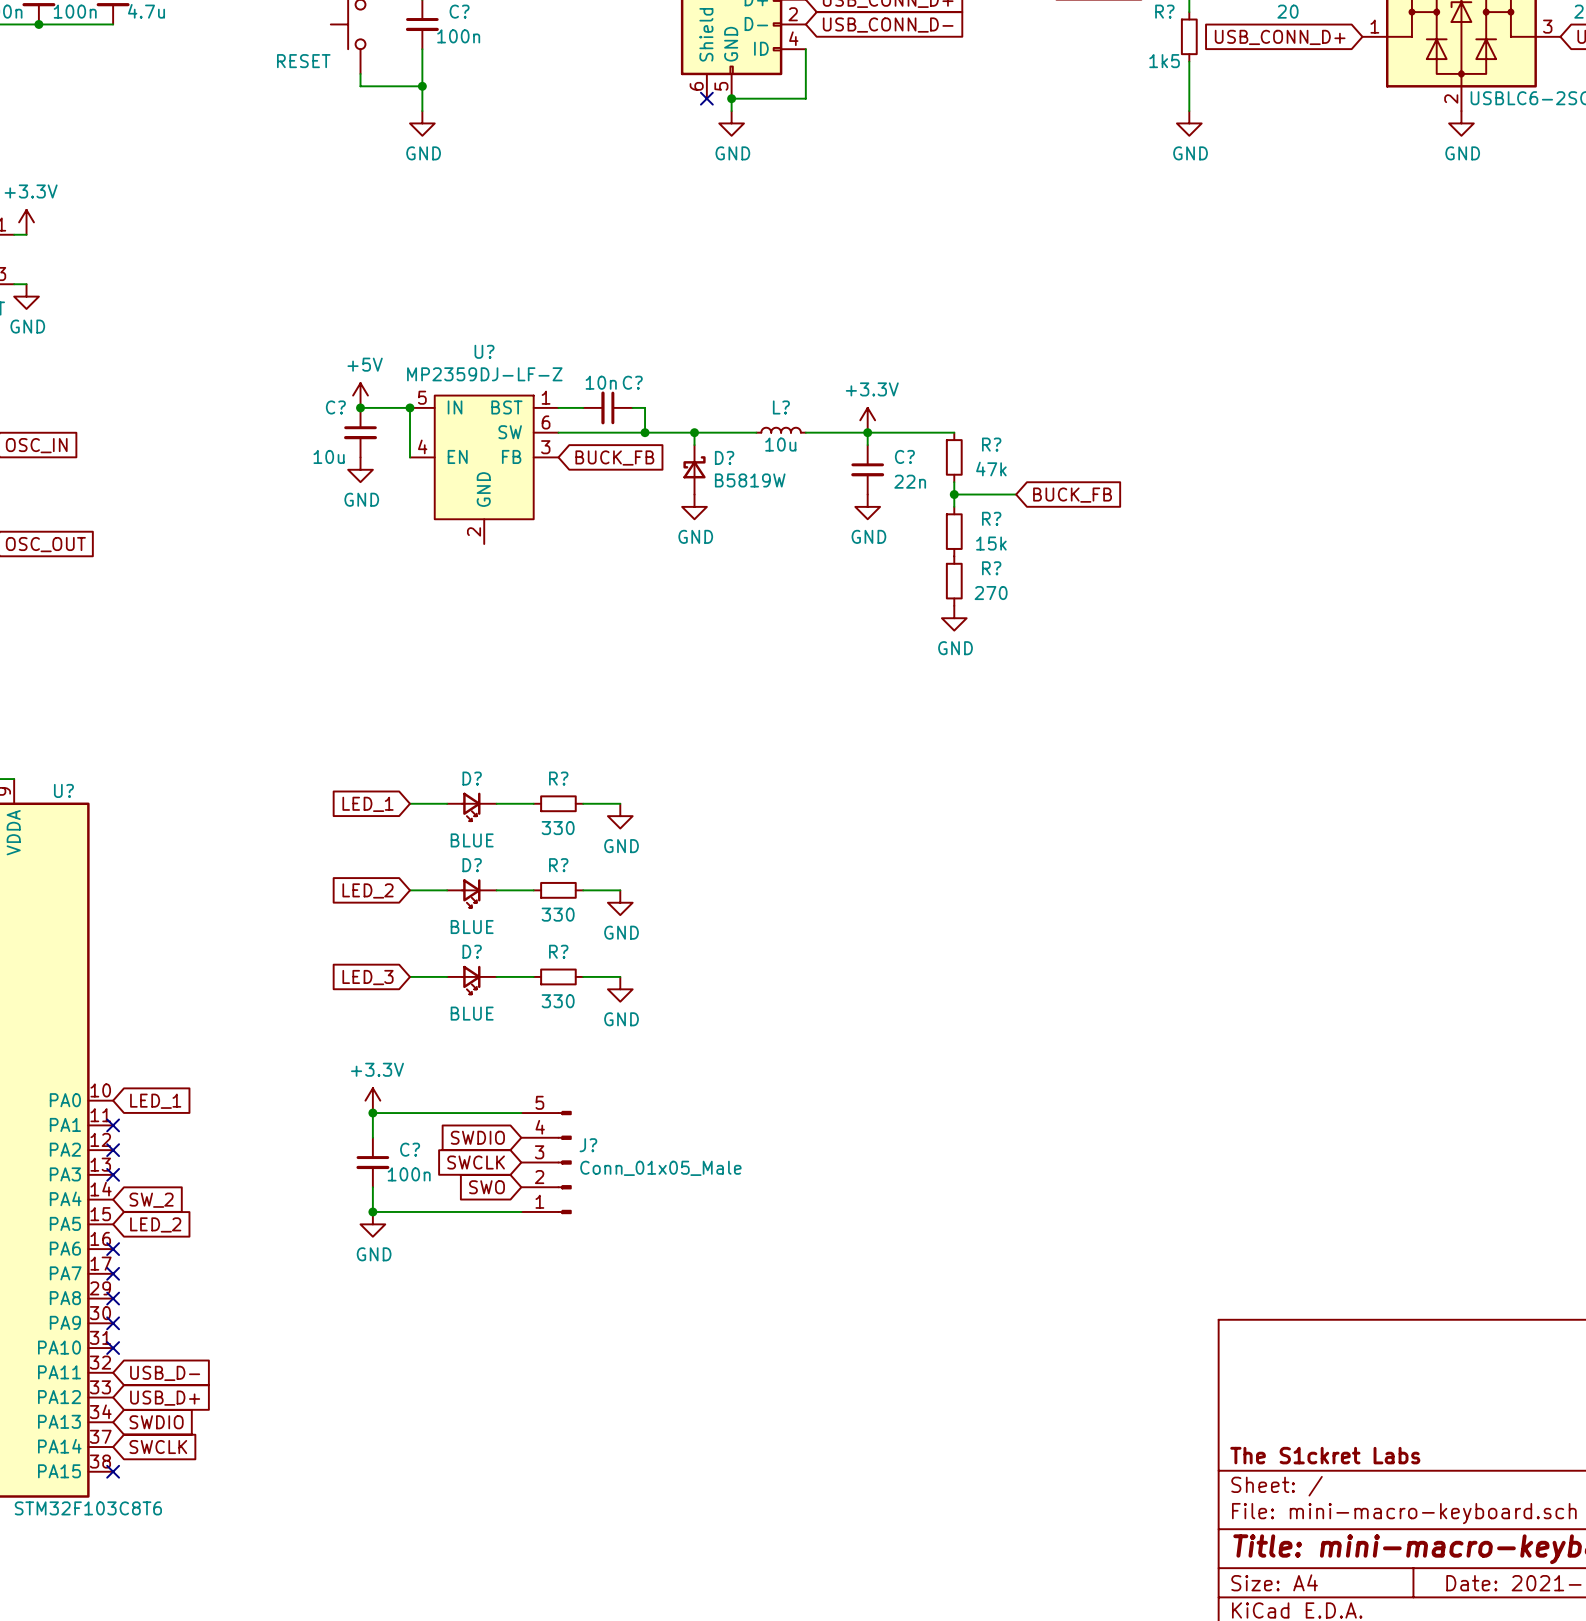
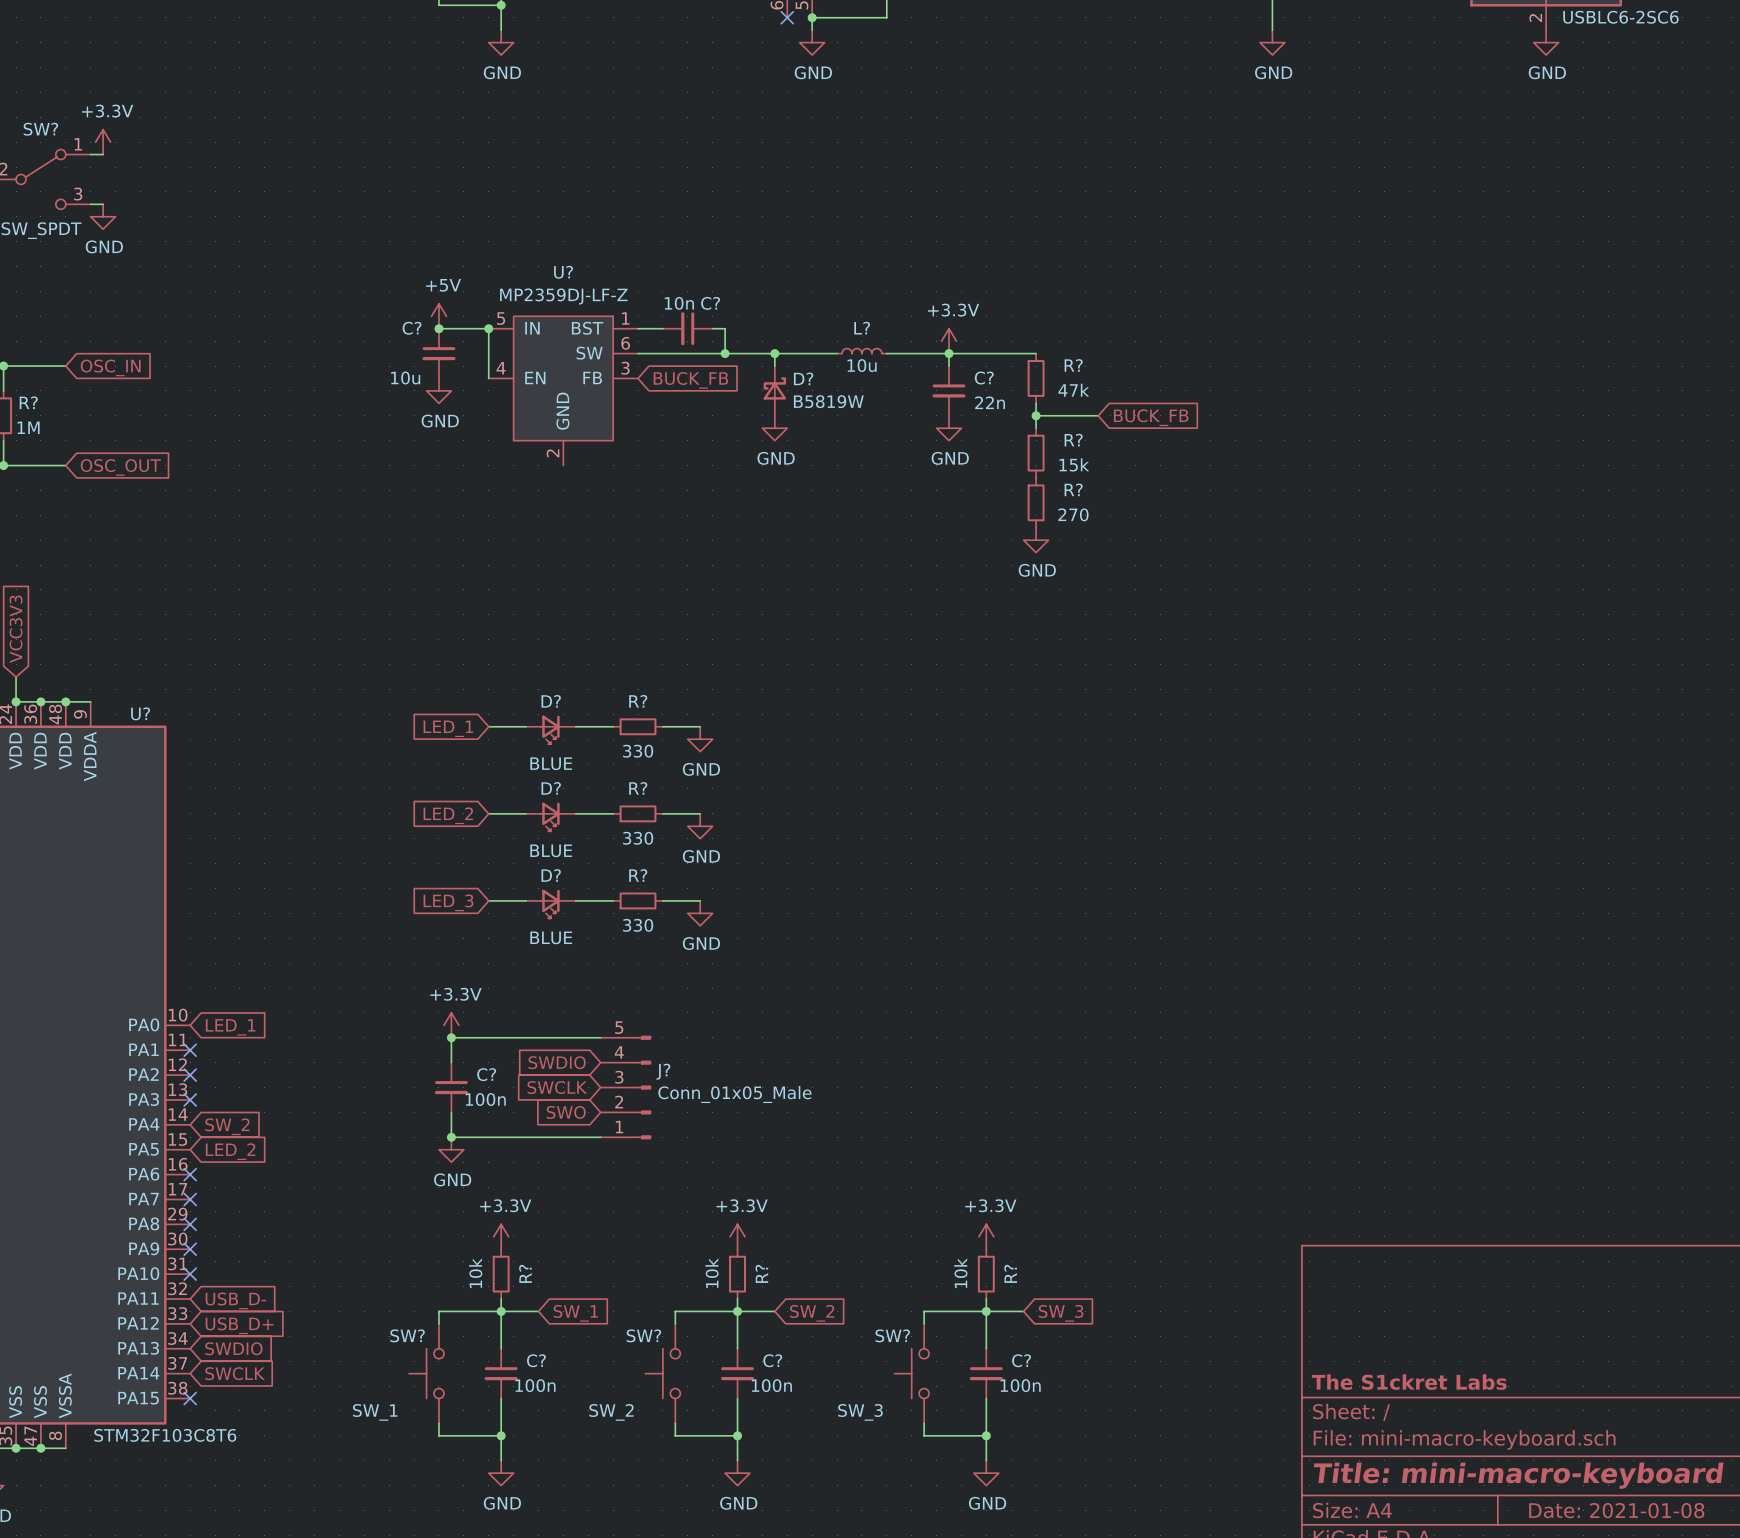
power symbol: none -> +3.3V (501, 1236)
power symbol: none -> +3.3V (737, 1236)
power symbol: none -> +3.3V (986, 1236)
R?: none -> 10k (501, 1274)
R?: none -> 10k (737, 1274)
R?: none -> 10k (986, 1274)
wire: none -> (501, 1299) (501, 1348)
wire: none -> (737, 1299) (737, 1348)
wire: none -> (986, 1299) (986, 1348)
junction: none -> (501, 1311)
wire: none -> (538, 1311) (438, 1311) (438, 1323)
global label: none -> SW_1 (575, 1313)
junction: none -> (737, 1311)
wire: none -> (774, 1311) (675, 1311) (675, 1323)
global label: none -> SW_2 (812, 1313)
junction: none -> (986, 1311)
wire: none -> (1023, 1311) (924, 1311) (924, 1323)
global label: none -> SW_3 (1061, 1313)
SW?: none -> SW_1 (426, 1373)
C?: none -> 100n (501, 1373)
SW?: none -> SW_2 (662, 1373)
C?: none -> 100n (737, 1373)
SW?: none -> SW_3 (911, 1373)
C?: none -> 100n (986, 1373)
wire: none -> (501, 1398) (501, 1460)
wire: none -> (737, 1398) (737, 1460)
wire: none -> (986, 1398) (986, 1460)
wire: none -> (438, 1423) (438, 1435) (501, 1435)
wire: none -> (675, 1423) (675, 1435) (737, 1435)
wire: none -> (924, 1423) (924, 1435) (986, 1435)
junction: none -> (501, 1435)
junction: none -> (737, 1435)
junction: none -> (986, 1435)
power symbol: none -> GND (501, 1473)
power symbol: none -> GND (737, 1473)
power symbol: none -> GND (986, 1473)

